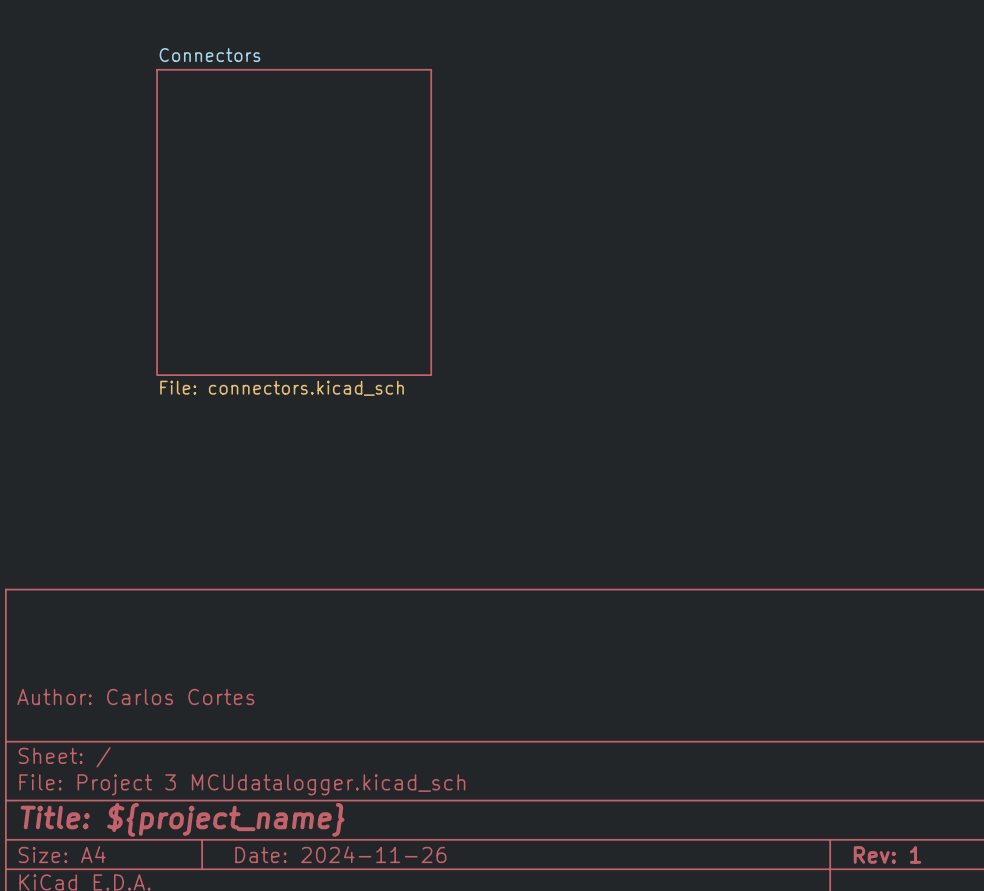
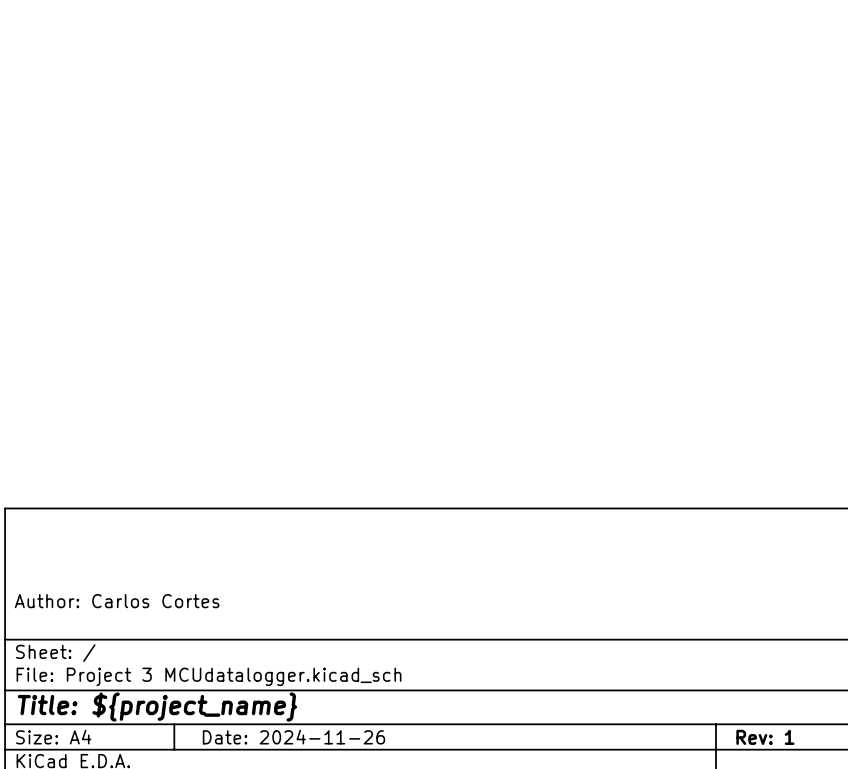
sheet Connectors: File: connectors.kicad_sch (294, 222) -> none

